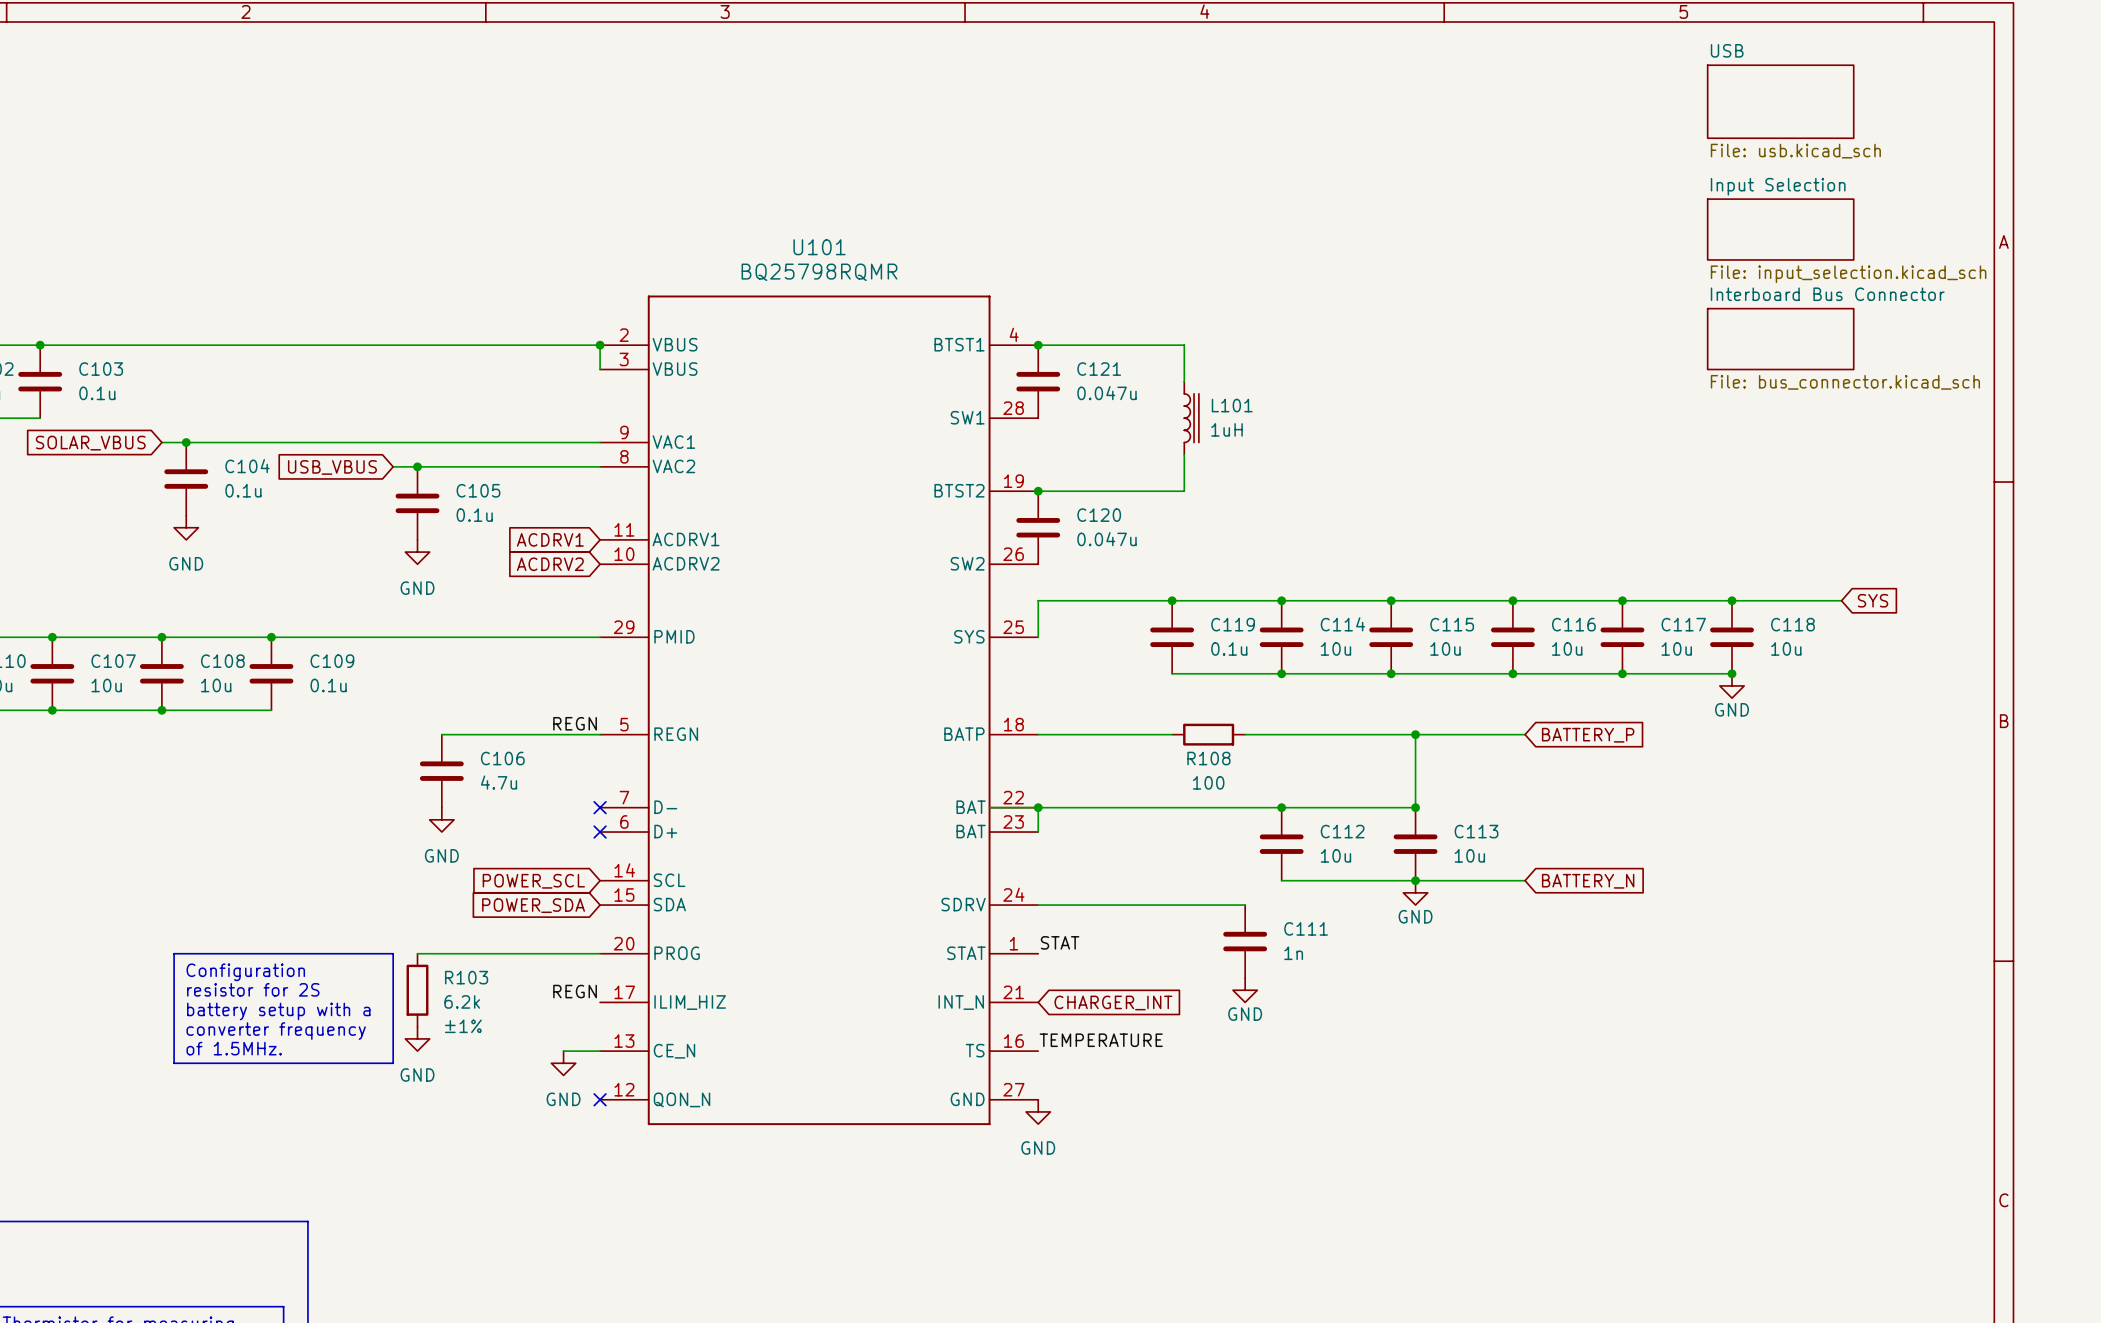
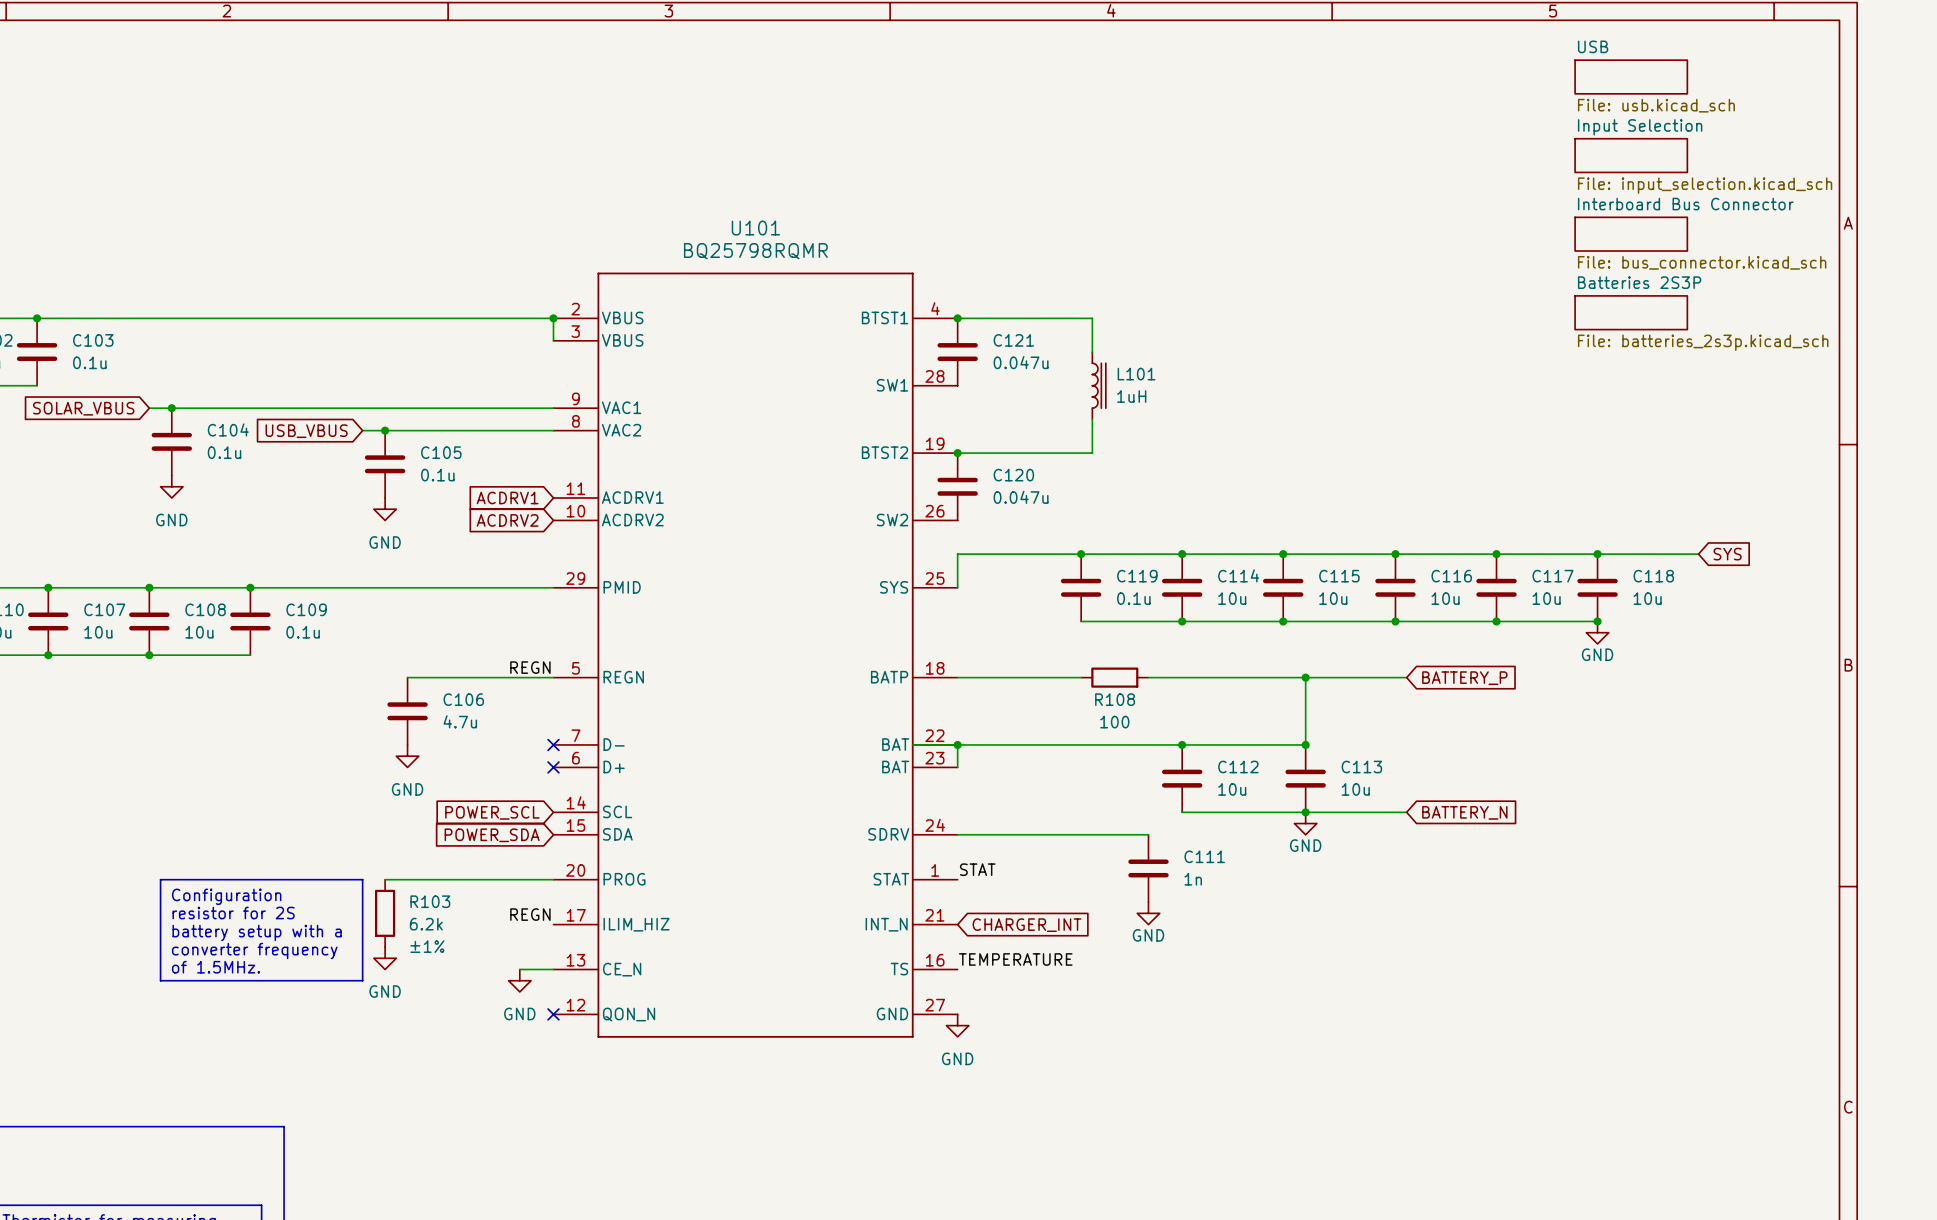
sheet USB: none -> File: usb.kicad_sch (1631, 77)
sheet USB: File: usb.kicad_sch (1780, 101) -> none
sheet Input Selection: none -> File: input_selection.kicad_sch (1631, 155)
sheet Input Selection: File: input_selection.kicad_sch (1780, 229) -> none
sheet Interboard Bus Connector: none -> File: bus_connector.kicad_sch (1631, 234)
sheet Batteries 2S3P: none -> File: batteries_2s3p.kicad_sch (1631, 312)
sheet Interboard Bus Connector: File: bus_connector.kicad_sch (1780, 339) -> none

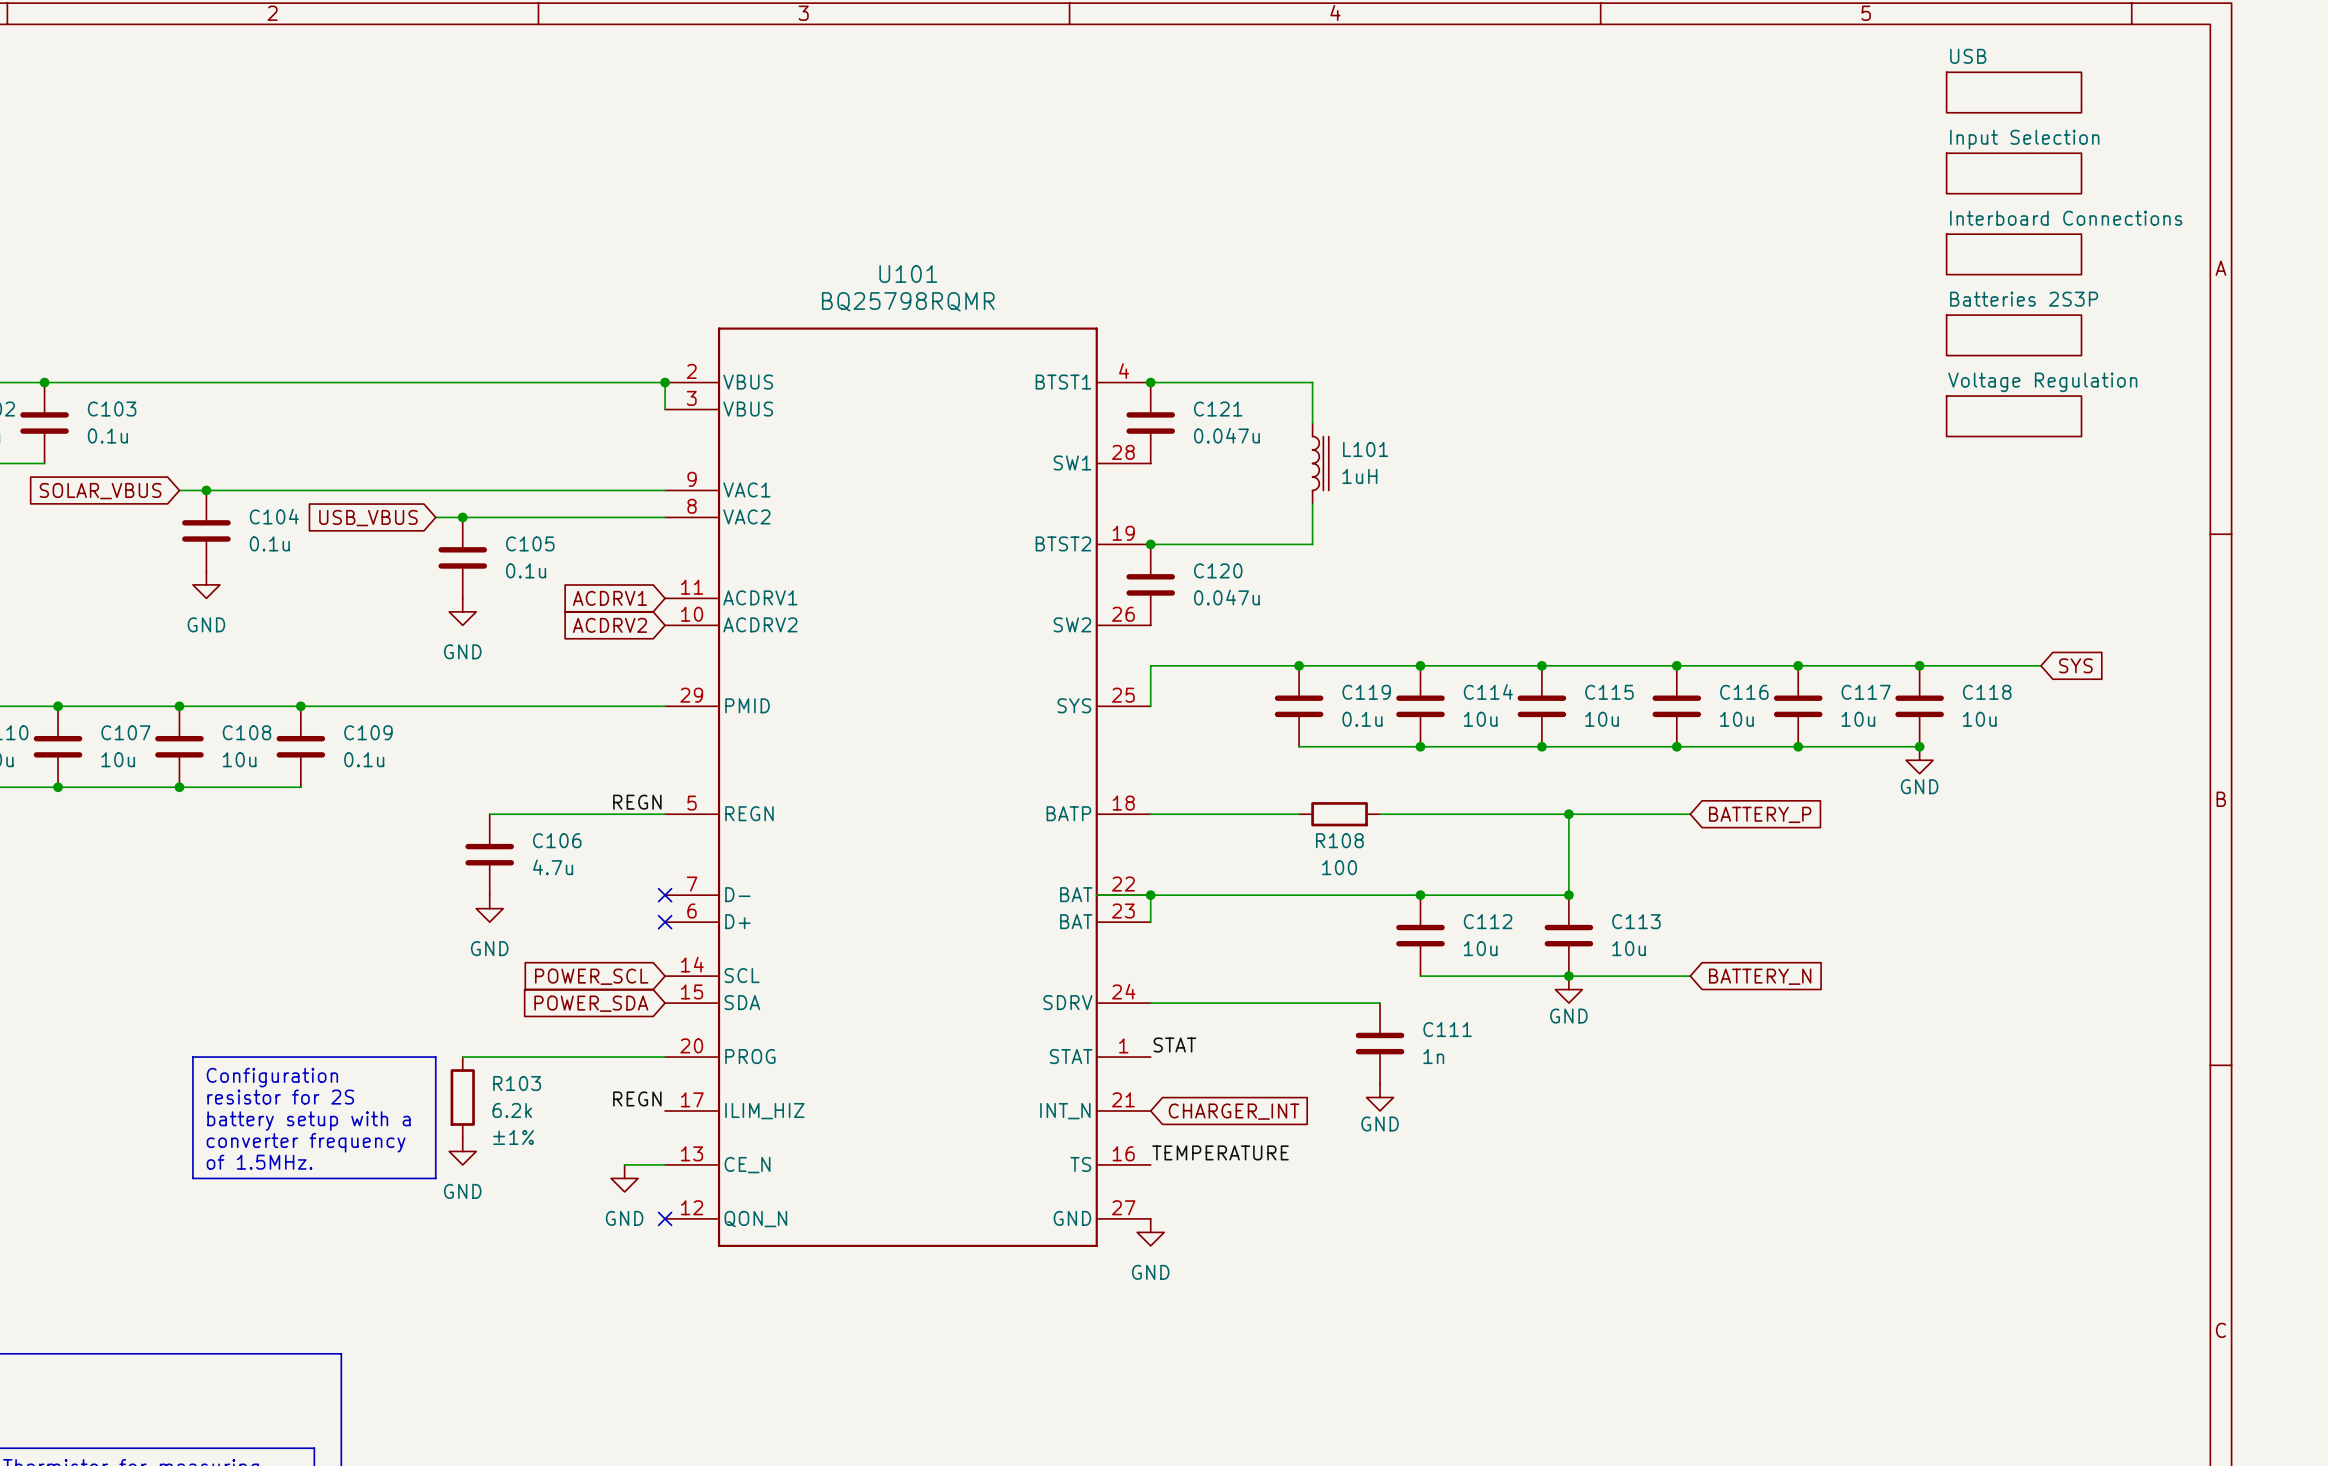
sheet USB: File: usb.kicad_sch (1631, 77) -> none
sheet USB: none -> (2014, 92)
sheet Input Selection: none -> (2014, 173)
sheet Input Selection: File: input_selection.kicad_sch (1631, 155) -> none
sheet Interboard Connections: none -> (2014, 254)
sheet Interboard Bus Connector: File: bus_connector.kicad_sch (1631, 234) -> none
sheet Batteries 2S3P position: (1631, 312) -> (2014, 335)
sheet Batteries 2S3P value: File: batteries_2s3p.kicad_sch (1703, 342) -> none
sheet Voltage Regulation: none -> (2014, 416)

